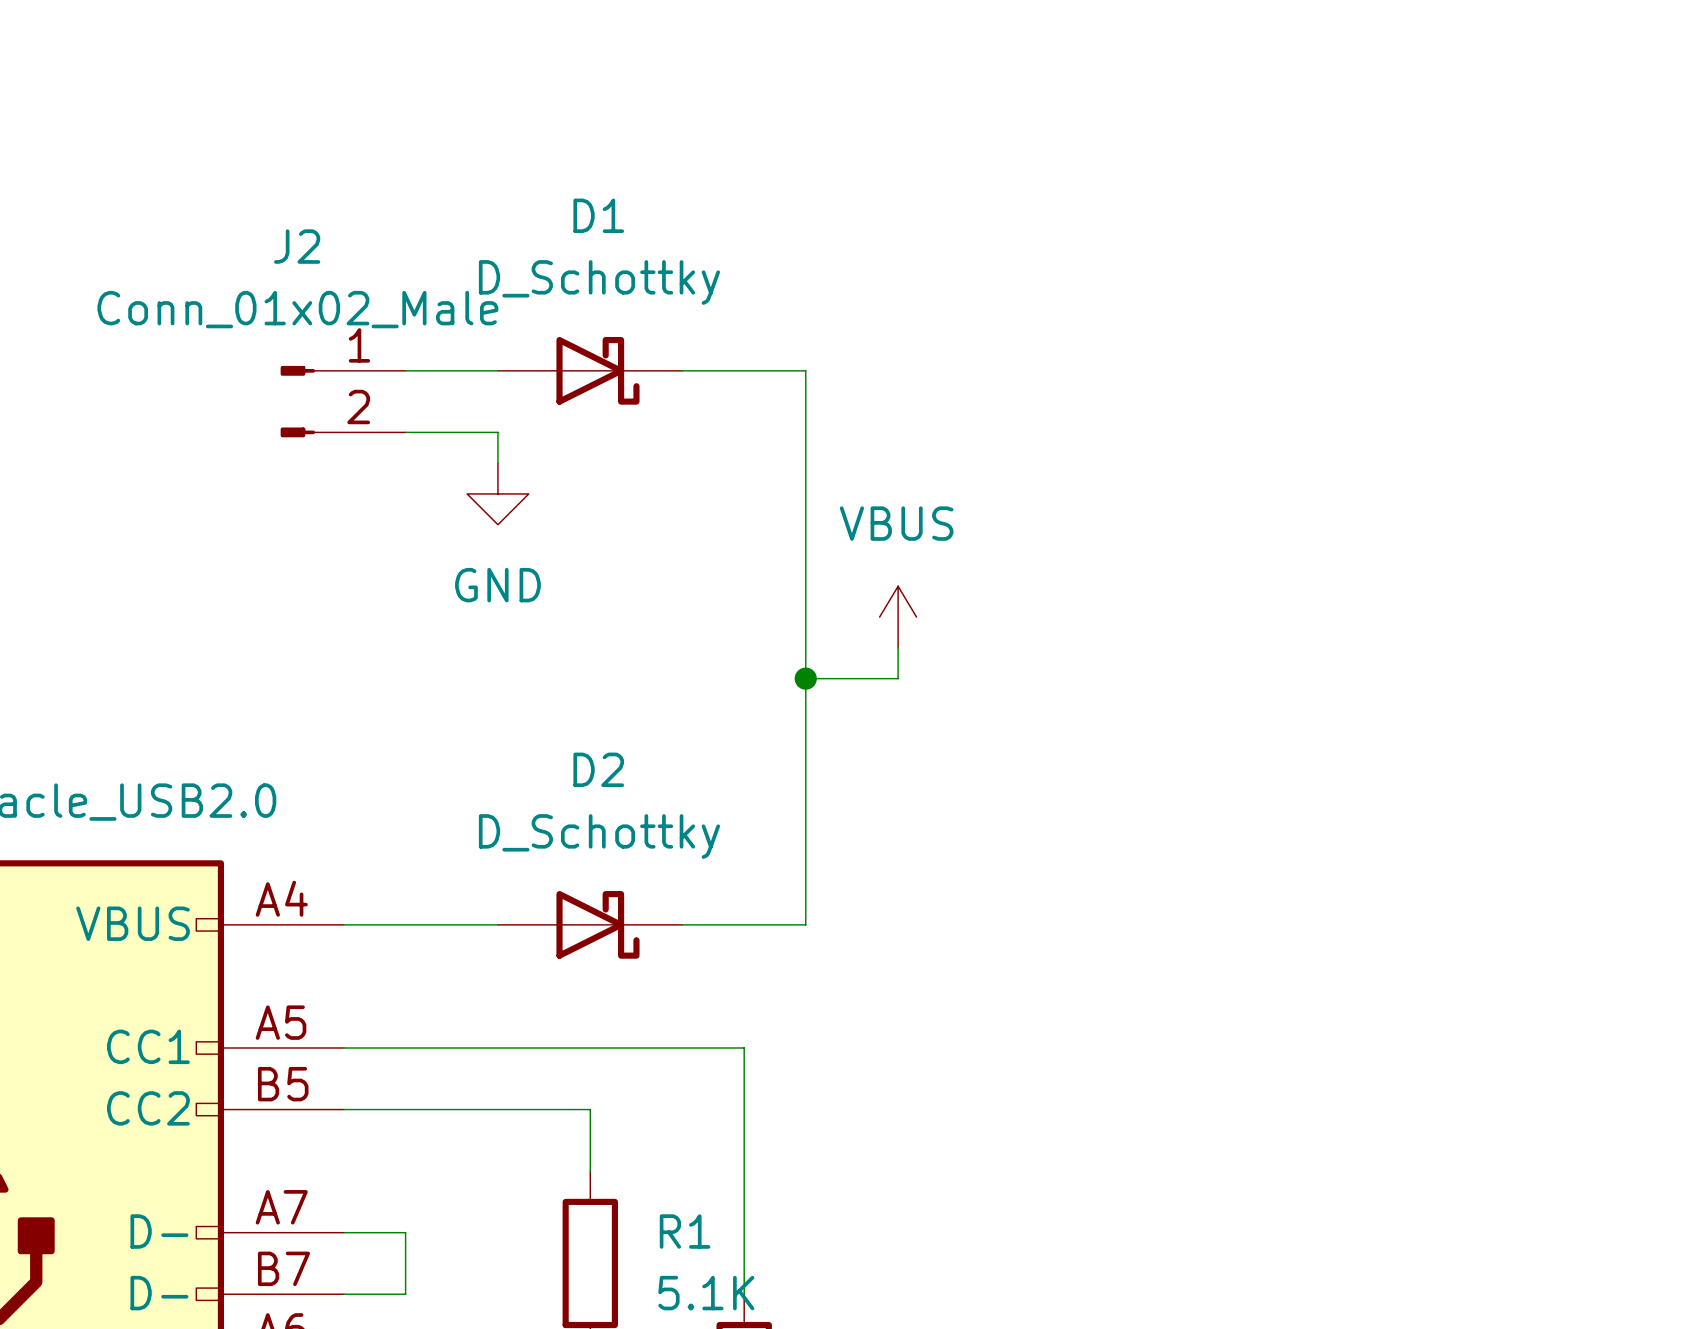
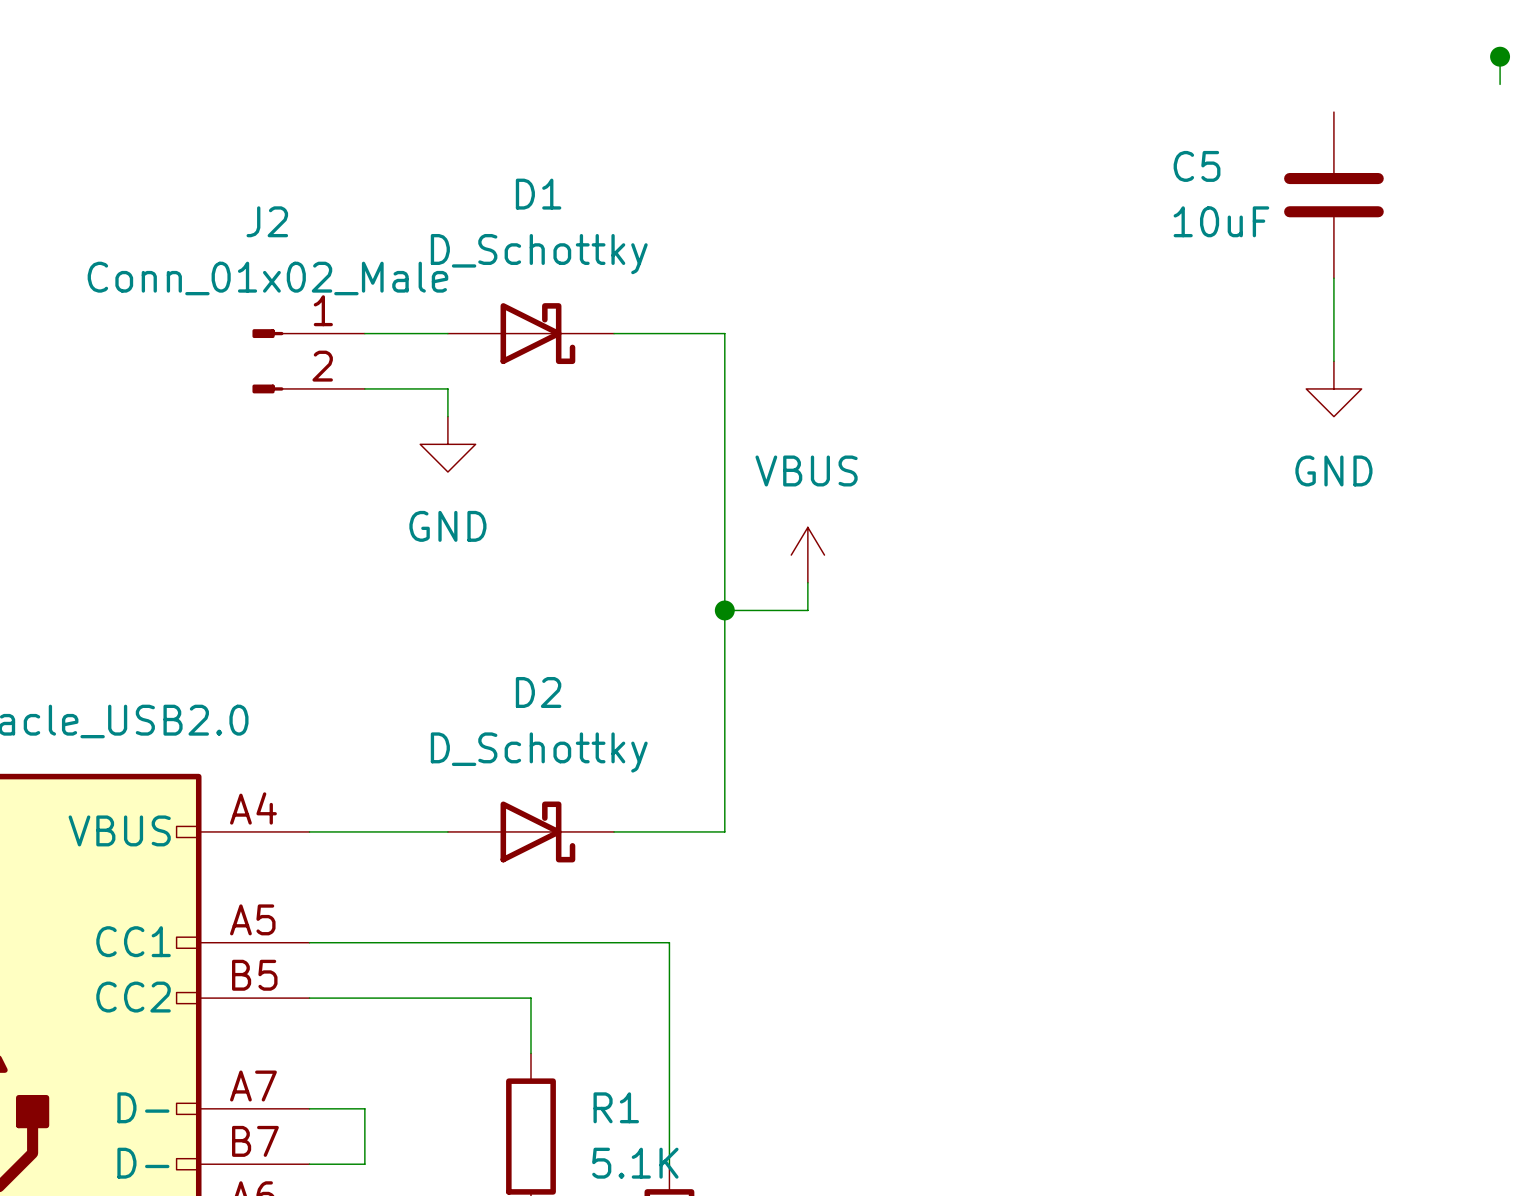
wire: none -> (1500, 56) (1500, 84)
junction: none -> (1500, 56)
C5: none -> 10uF (1333, 195)
wire: none -> (1333, 278) (1333, 361)
power symbol: none -> GND (1333, 388)

